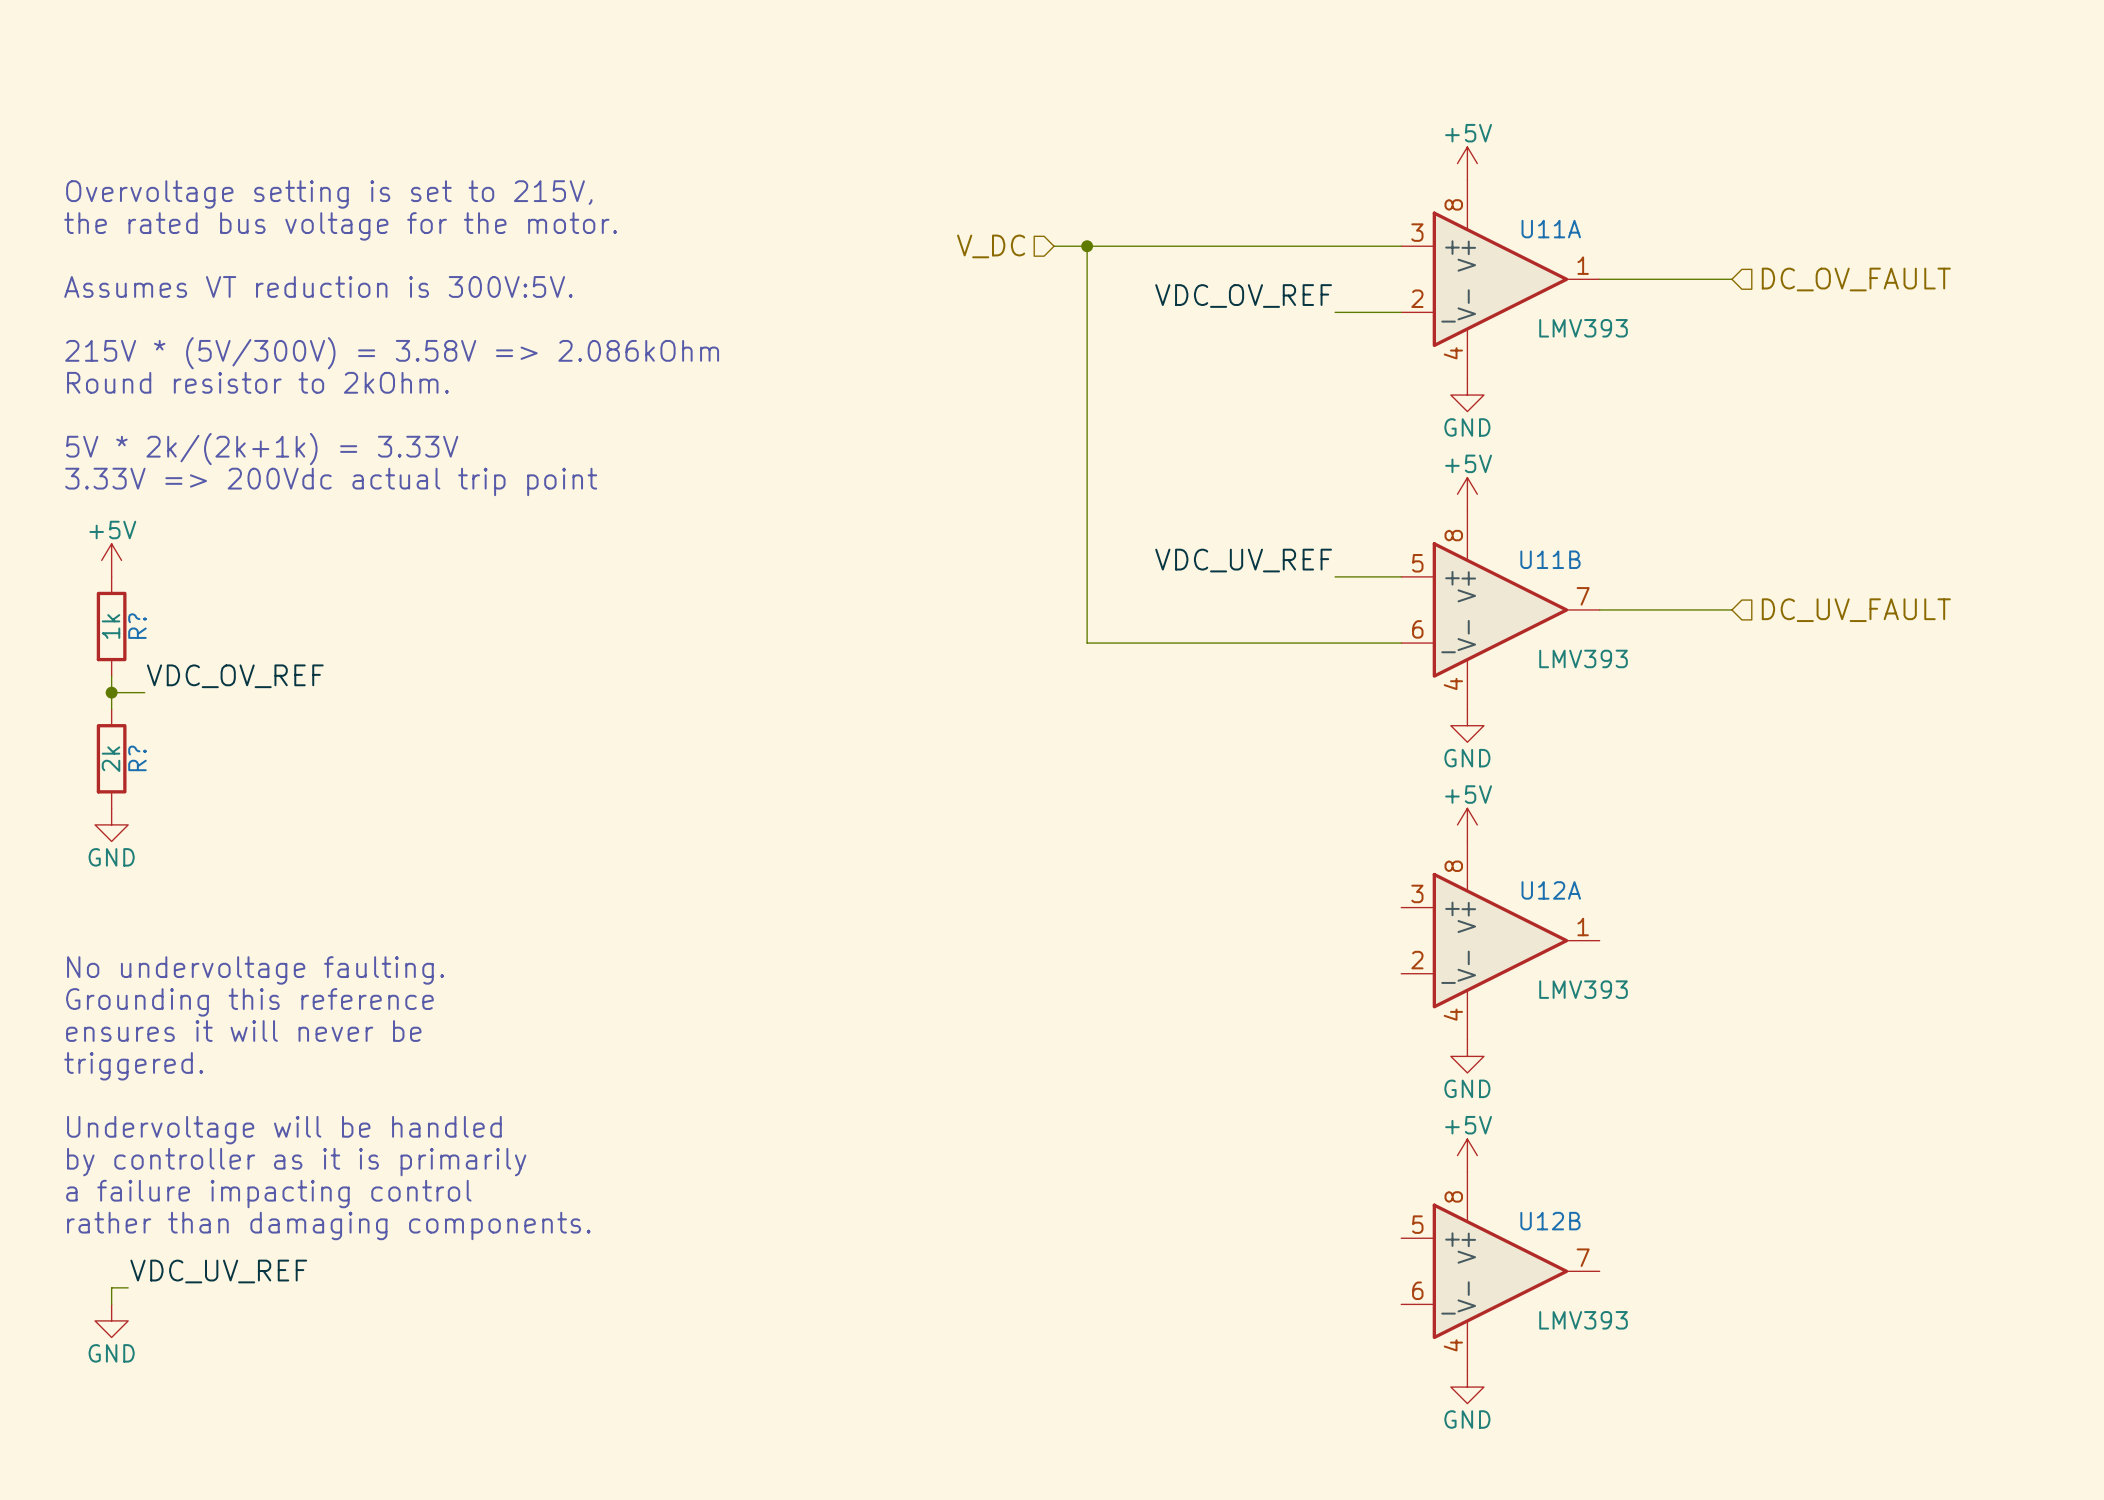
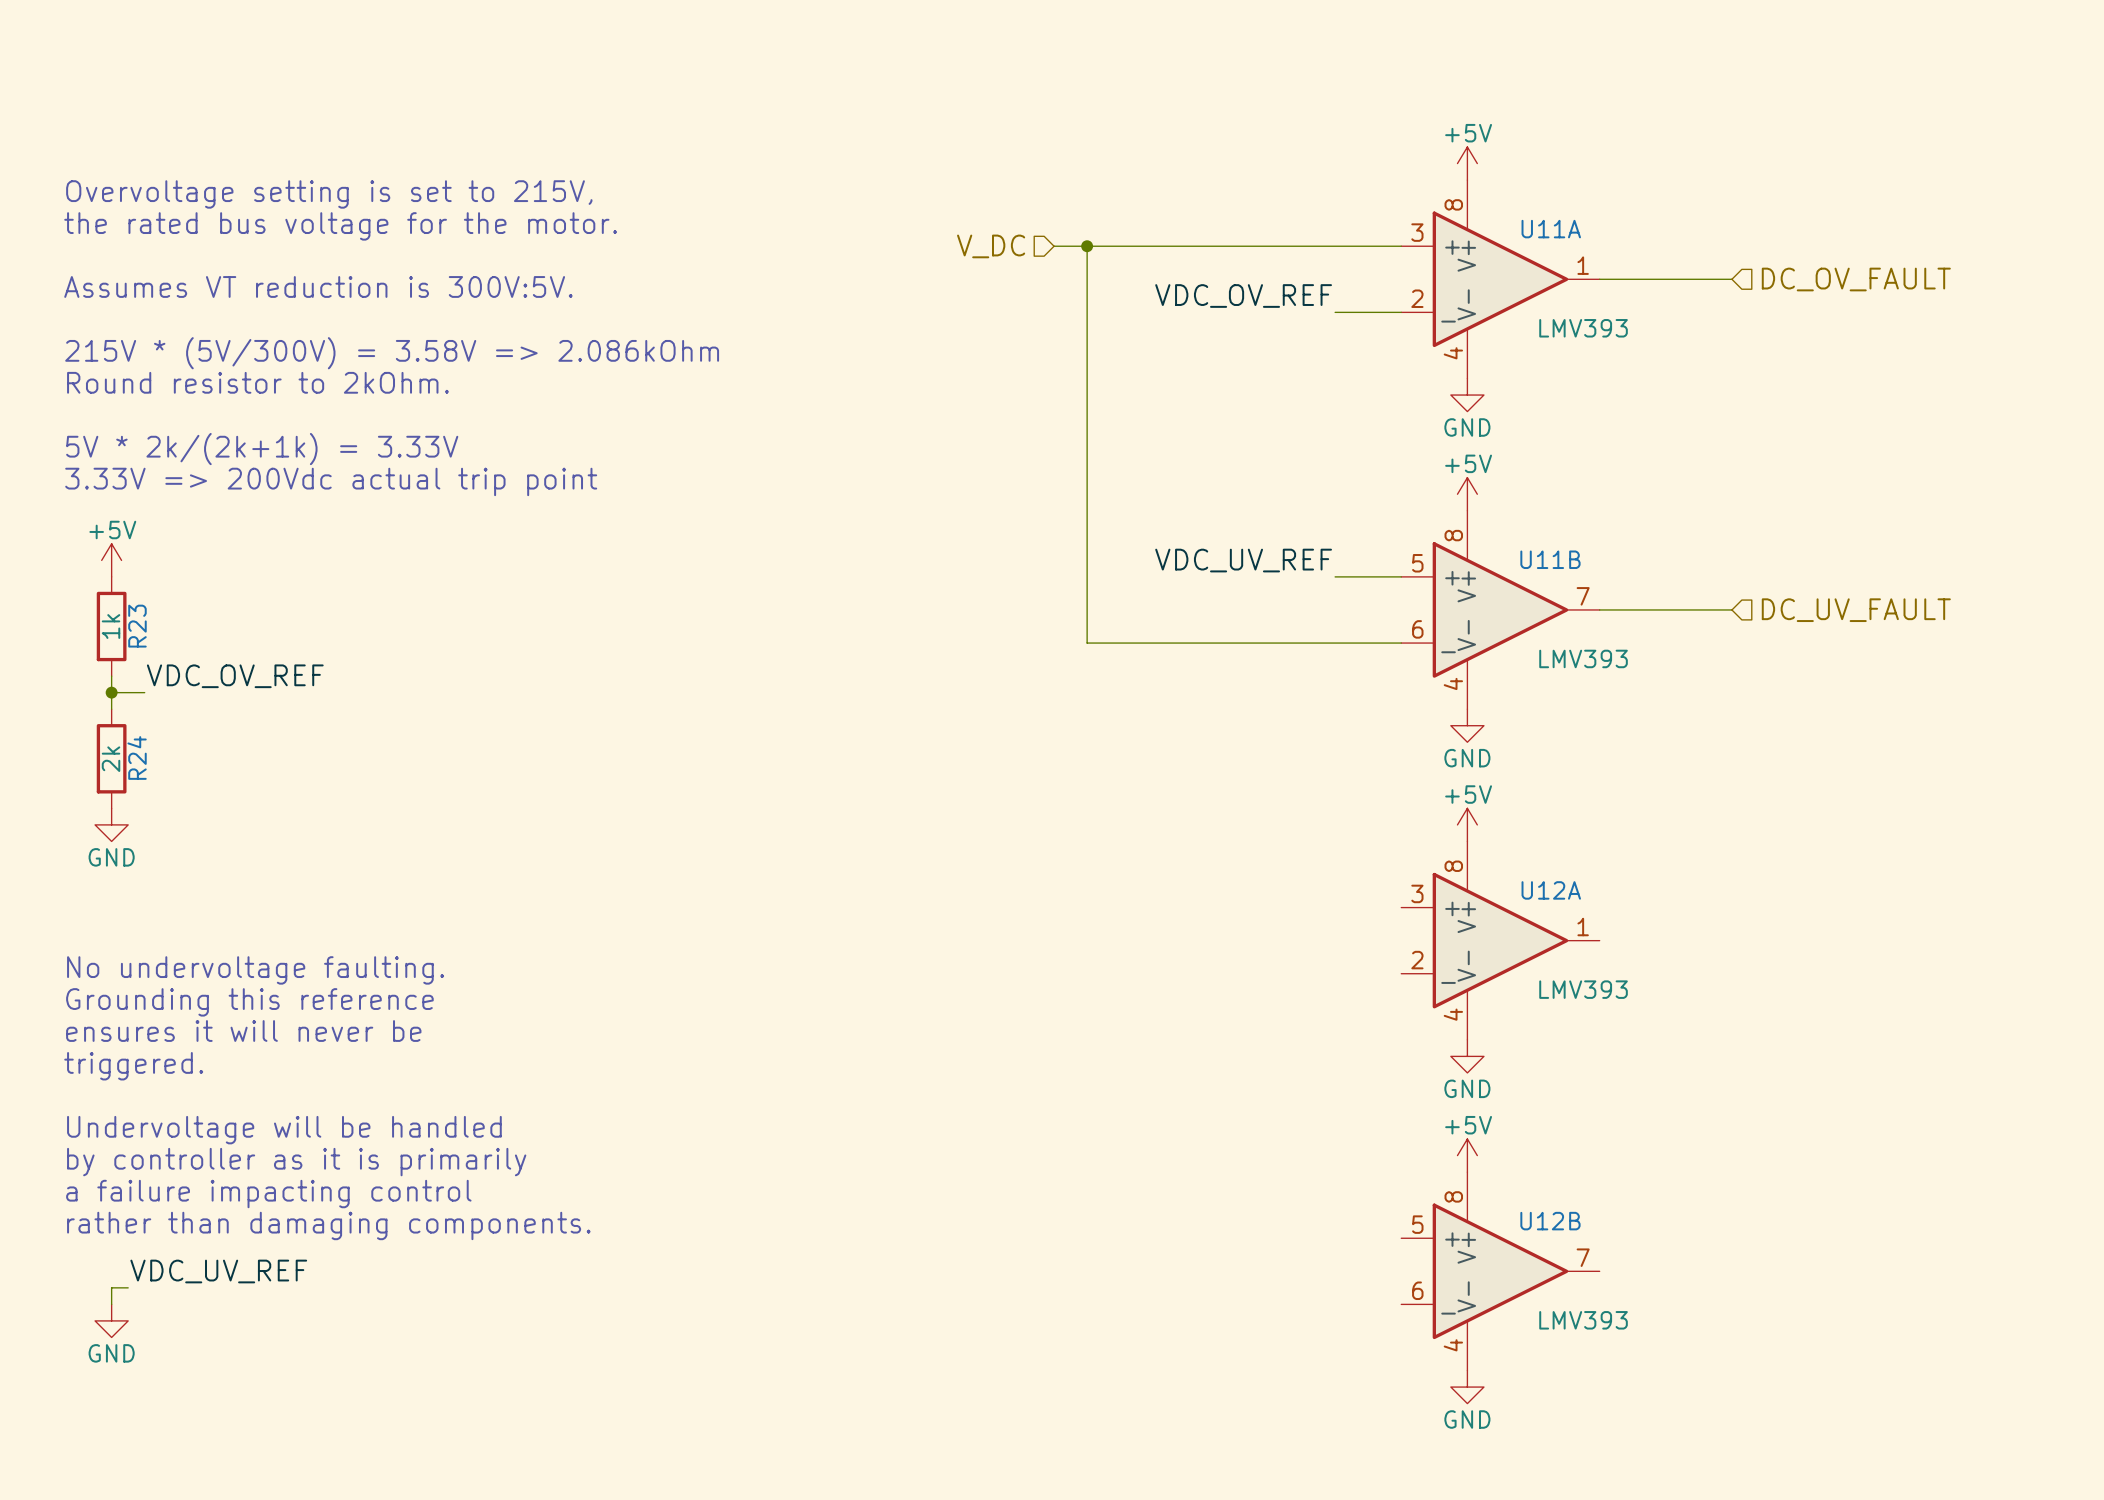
R? name: R? (137, 626) -> R23 (137, 626)
R? name: R? (137, 758) -> R24 (137, 757)

